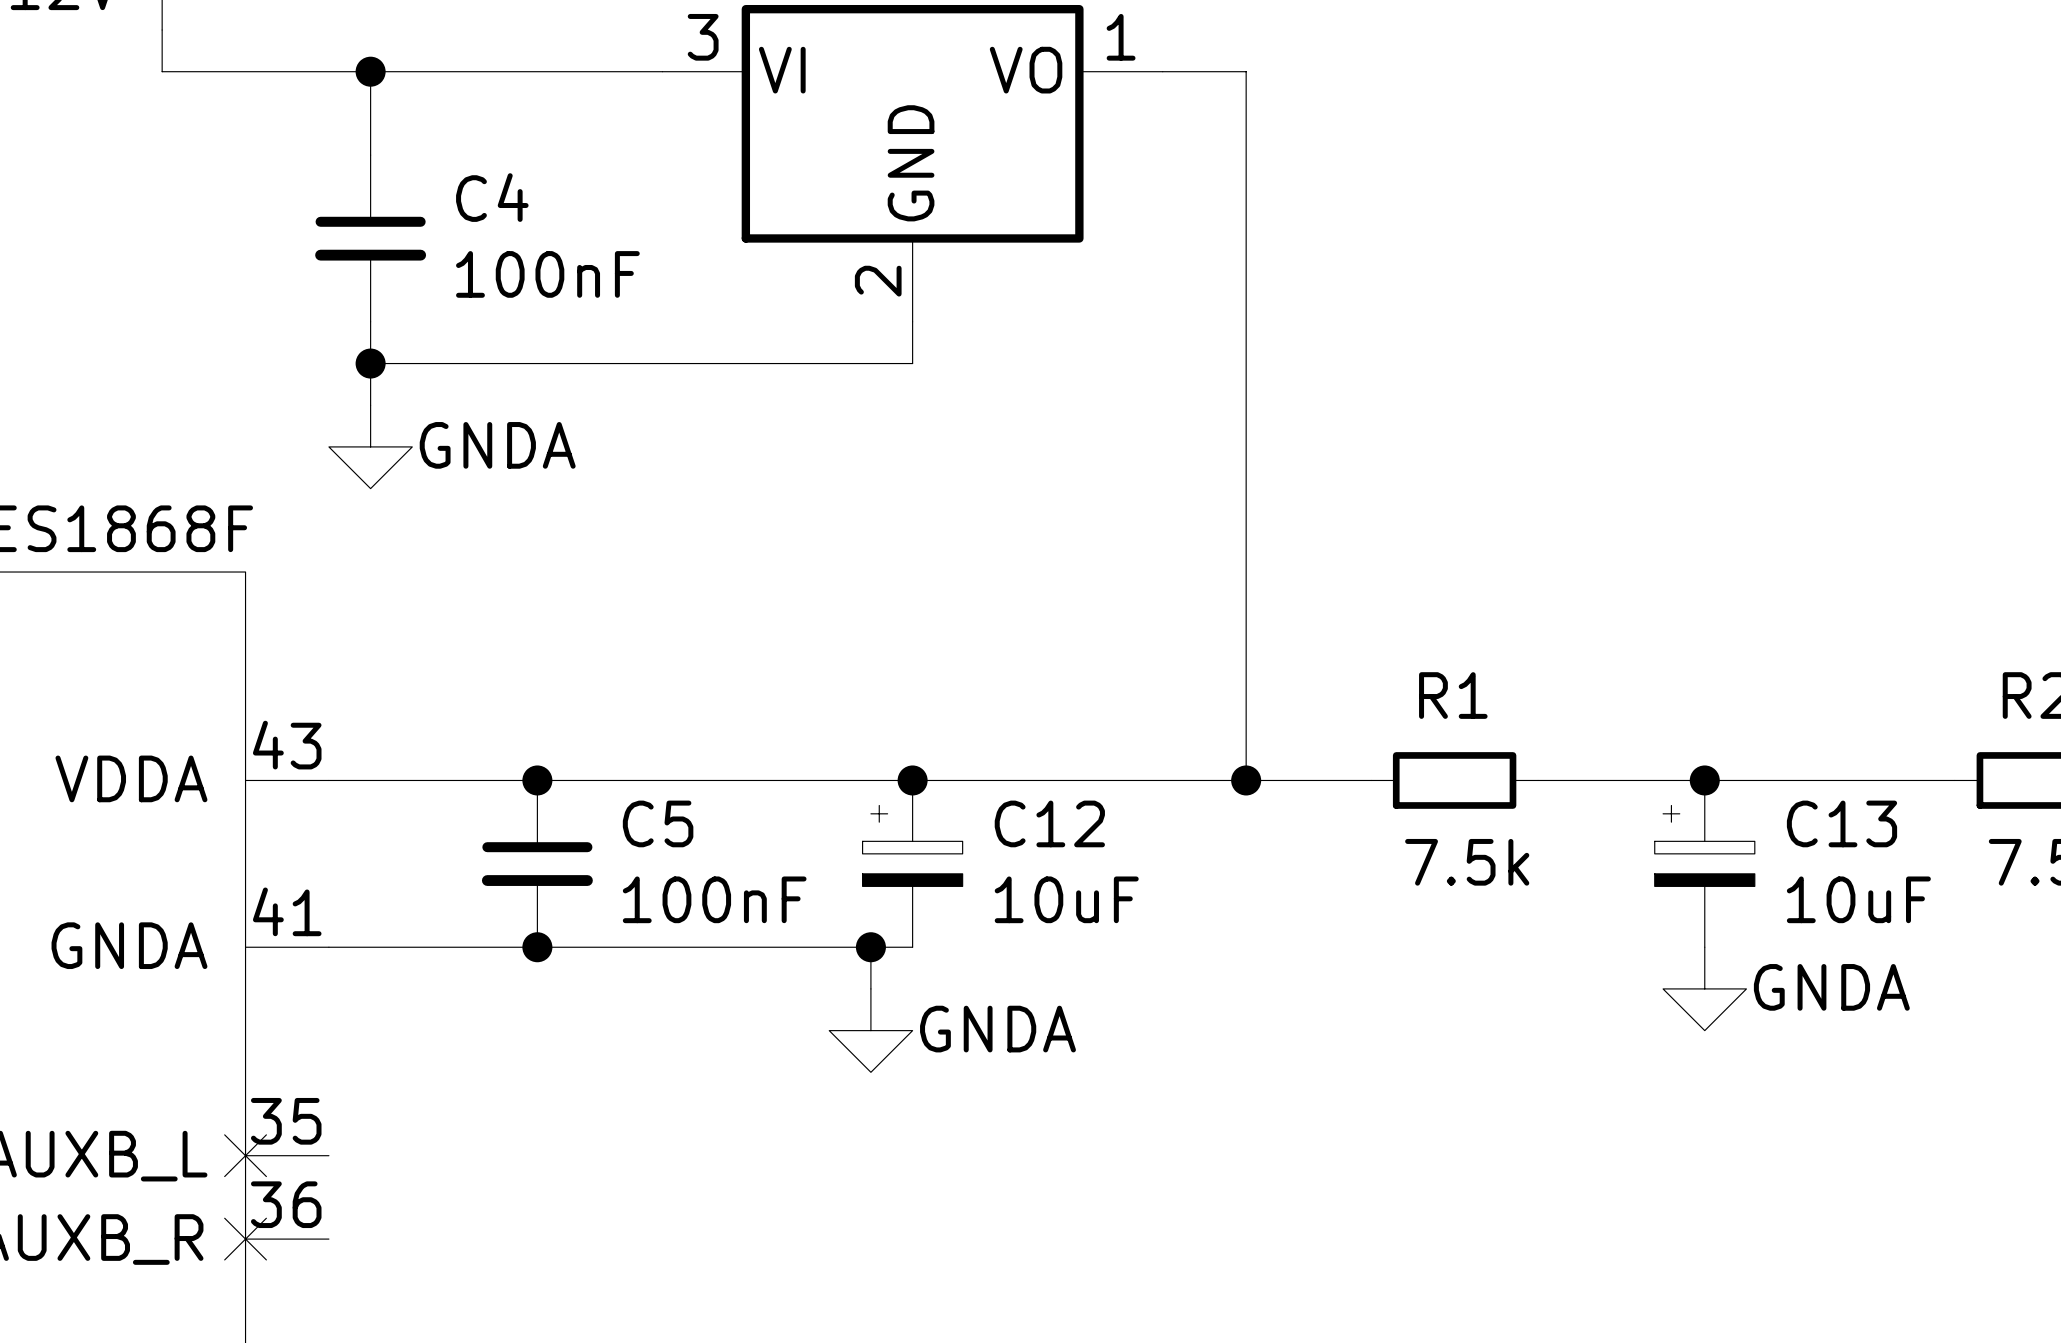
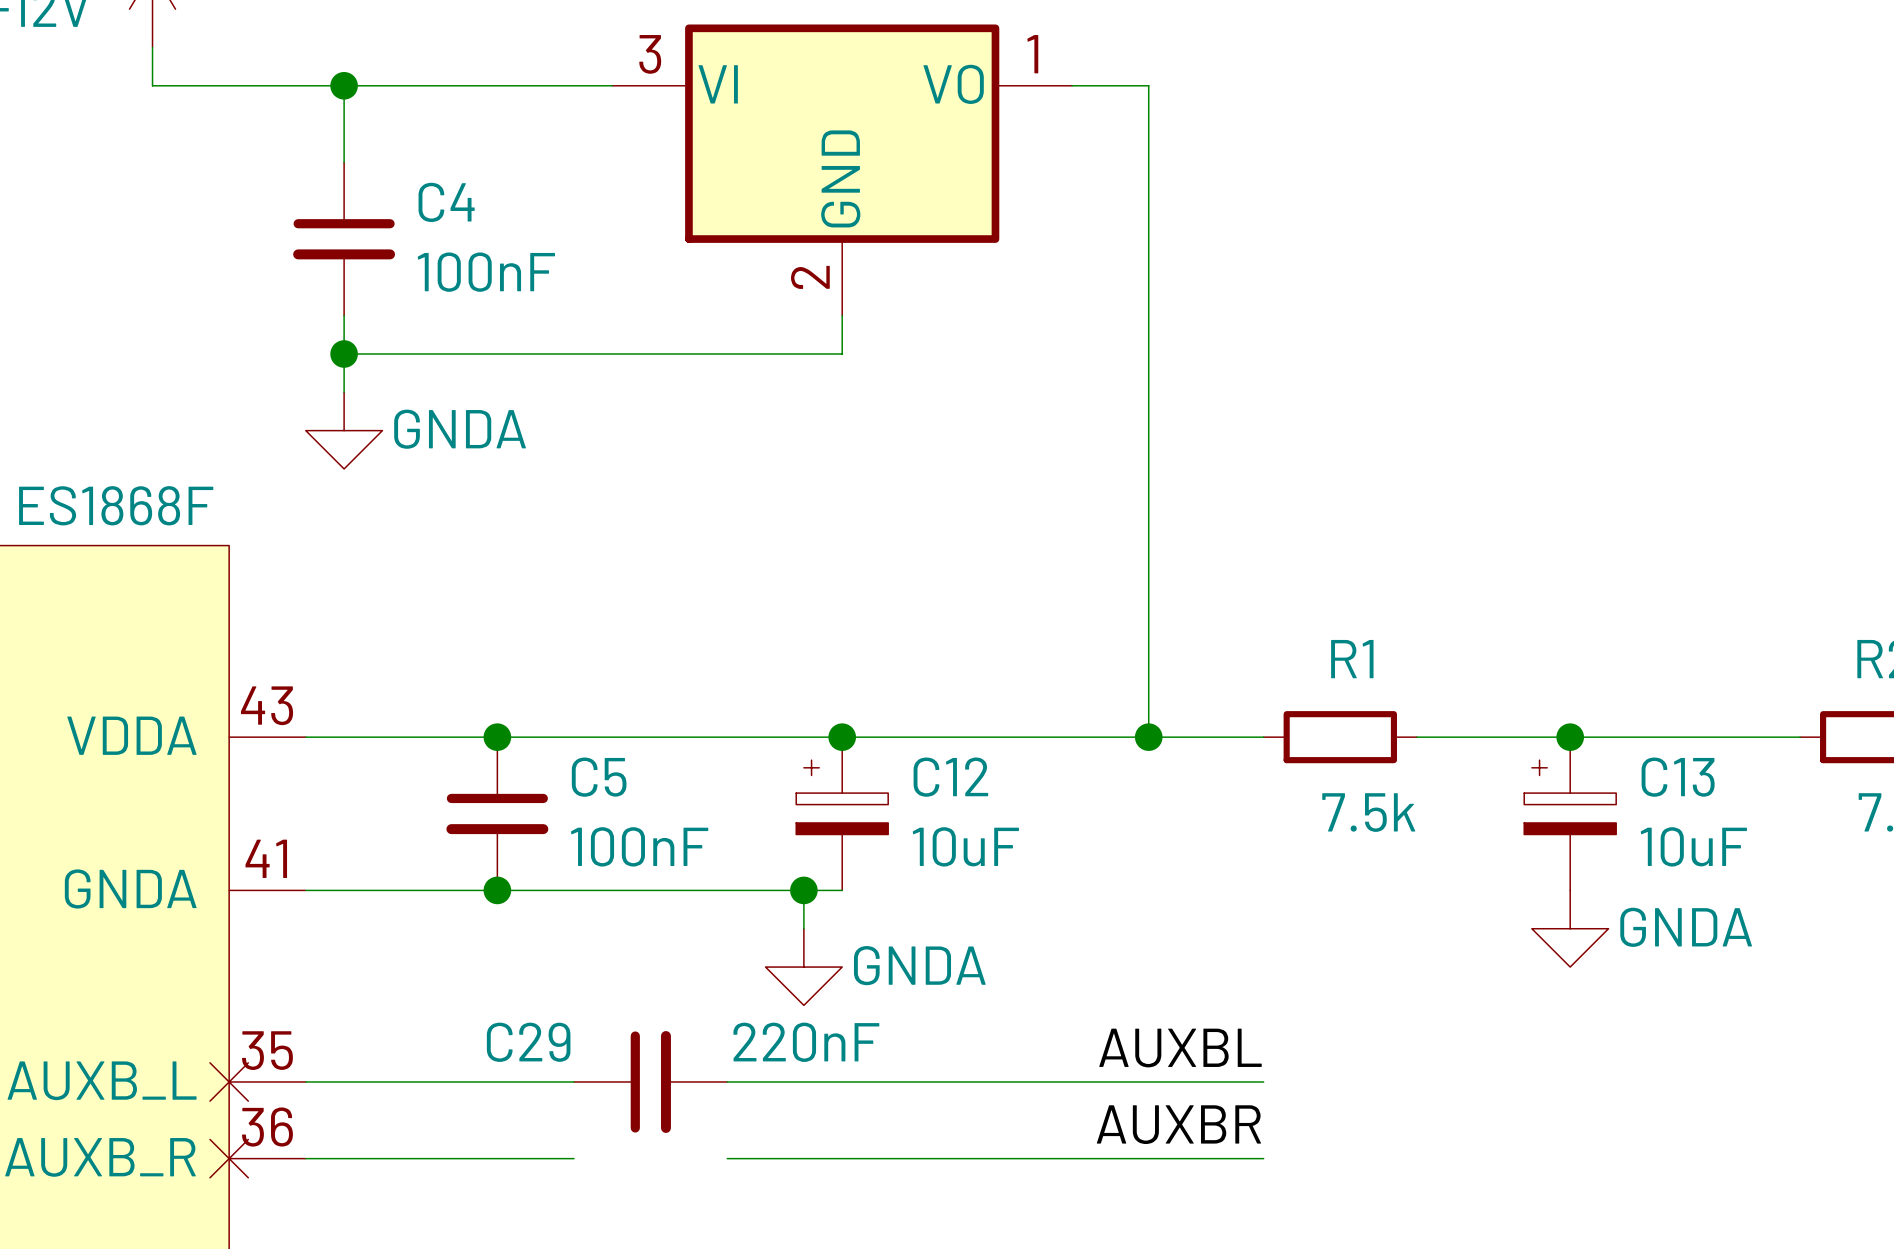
label: none -> AUXBL (1180, 1048)
wire: none -> (305, 1081) (573, 1081)
C29: none -> 220nF (650, 1081)
wire: none -> (727, 1081) (1263, 1081)
label: none -> AUXBR (1178, 1124)
wire: none -> (305, 1158) (573, 1158)
wire: none -> (727, 1158) (1263, 1158)

